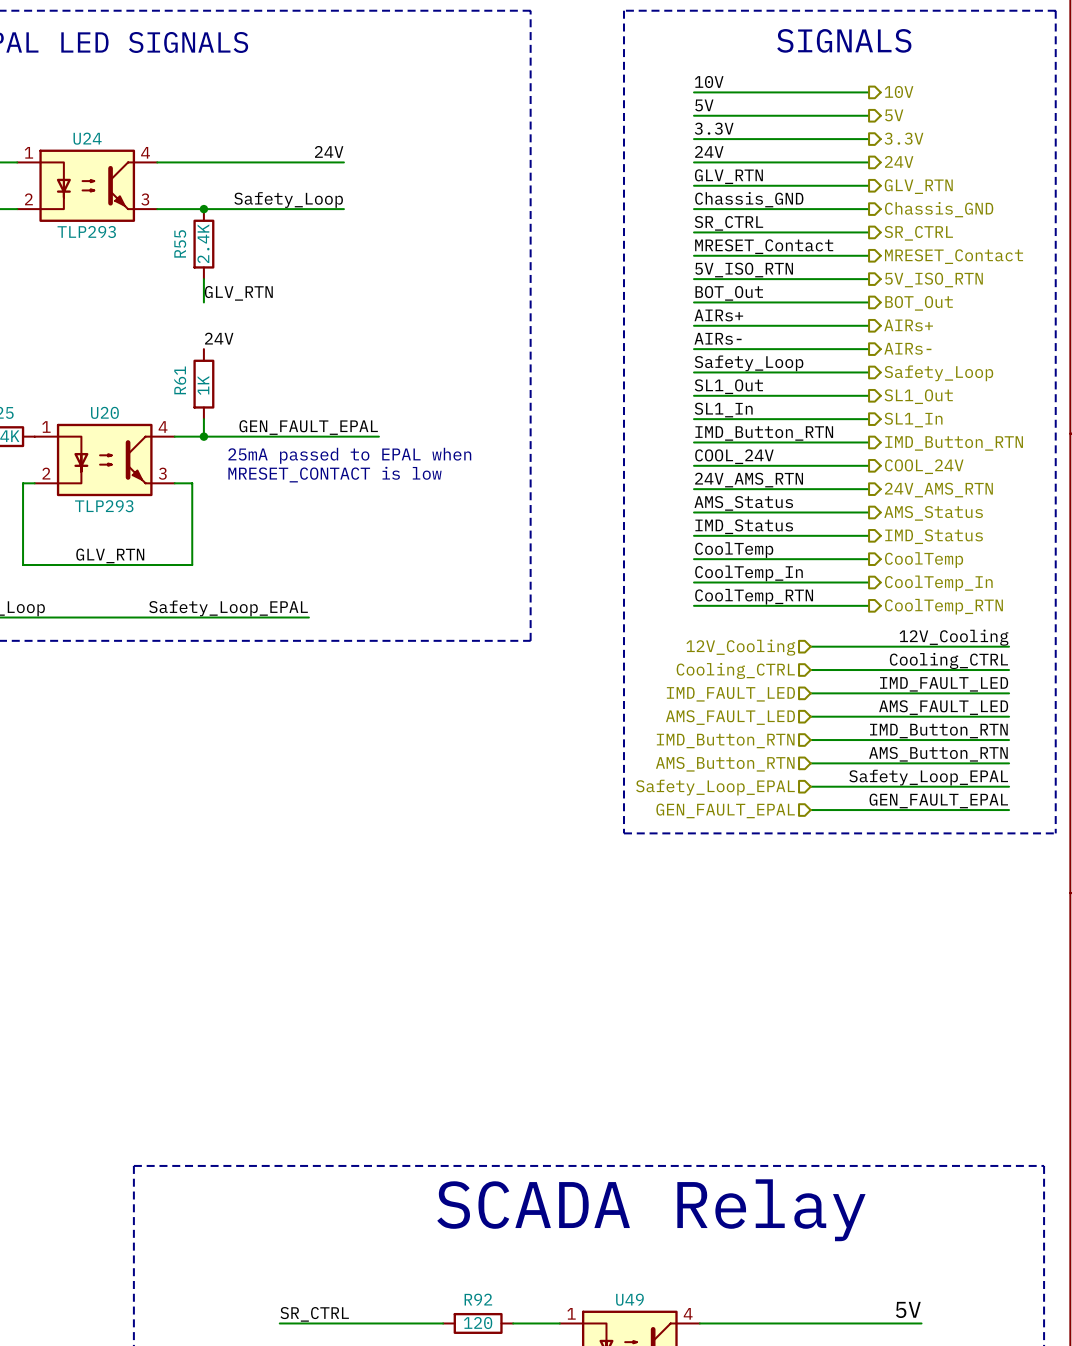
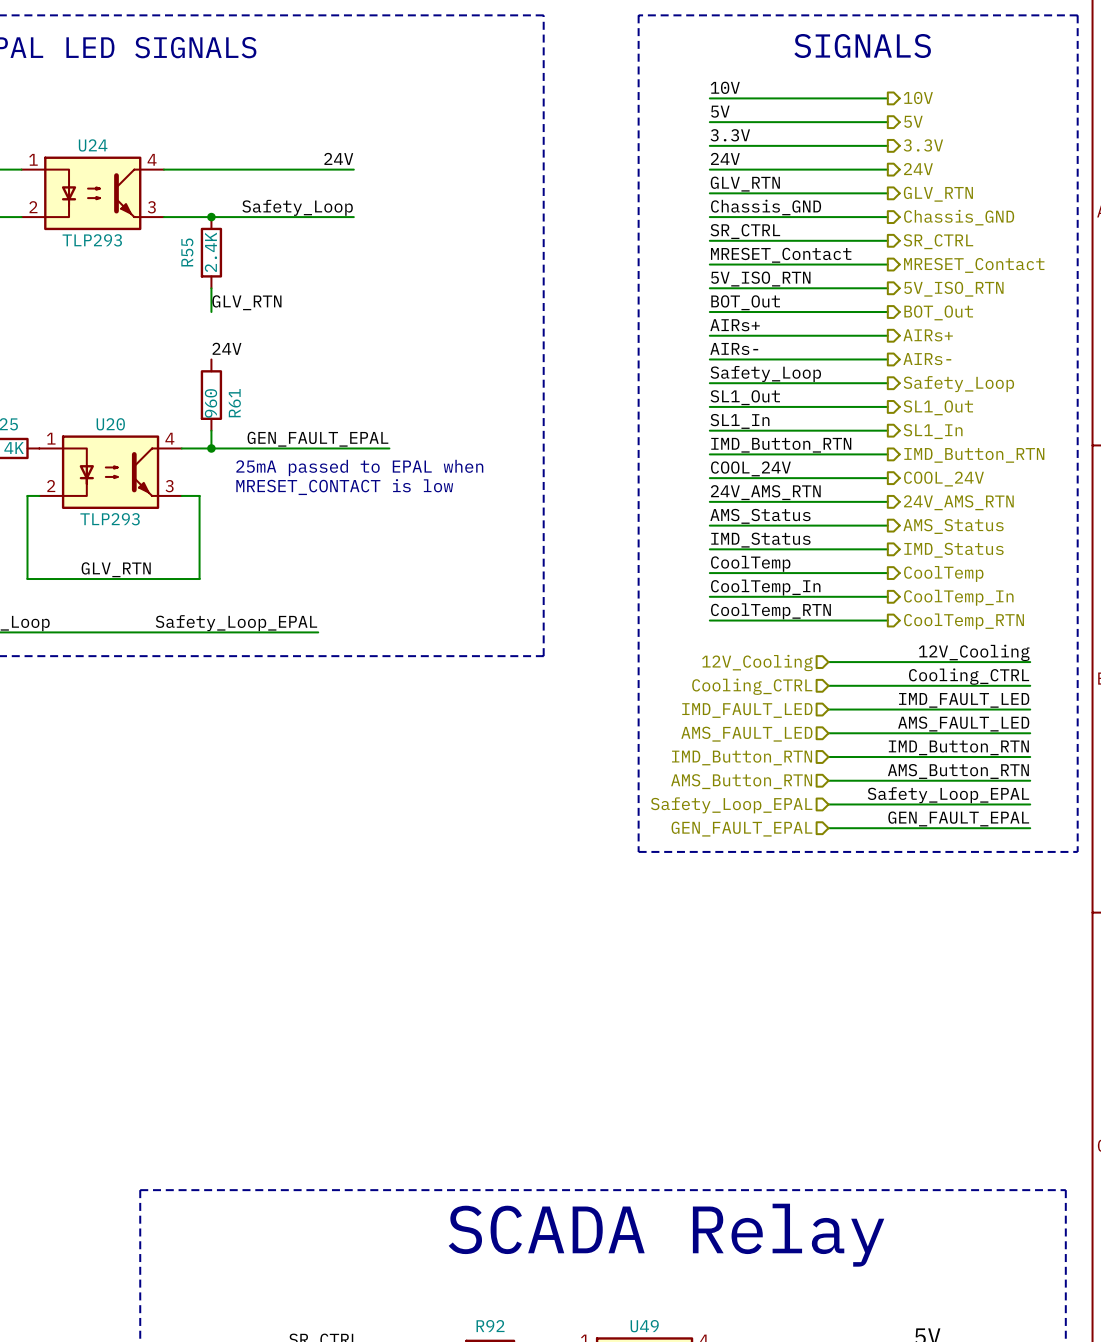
R61 name position: R61 (180, 380) -> R61 (234, 403)
R61 value: 1K (203, 385) -> 960 (210, 403)

